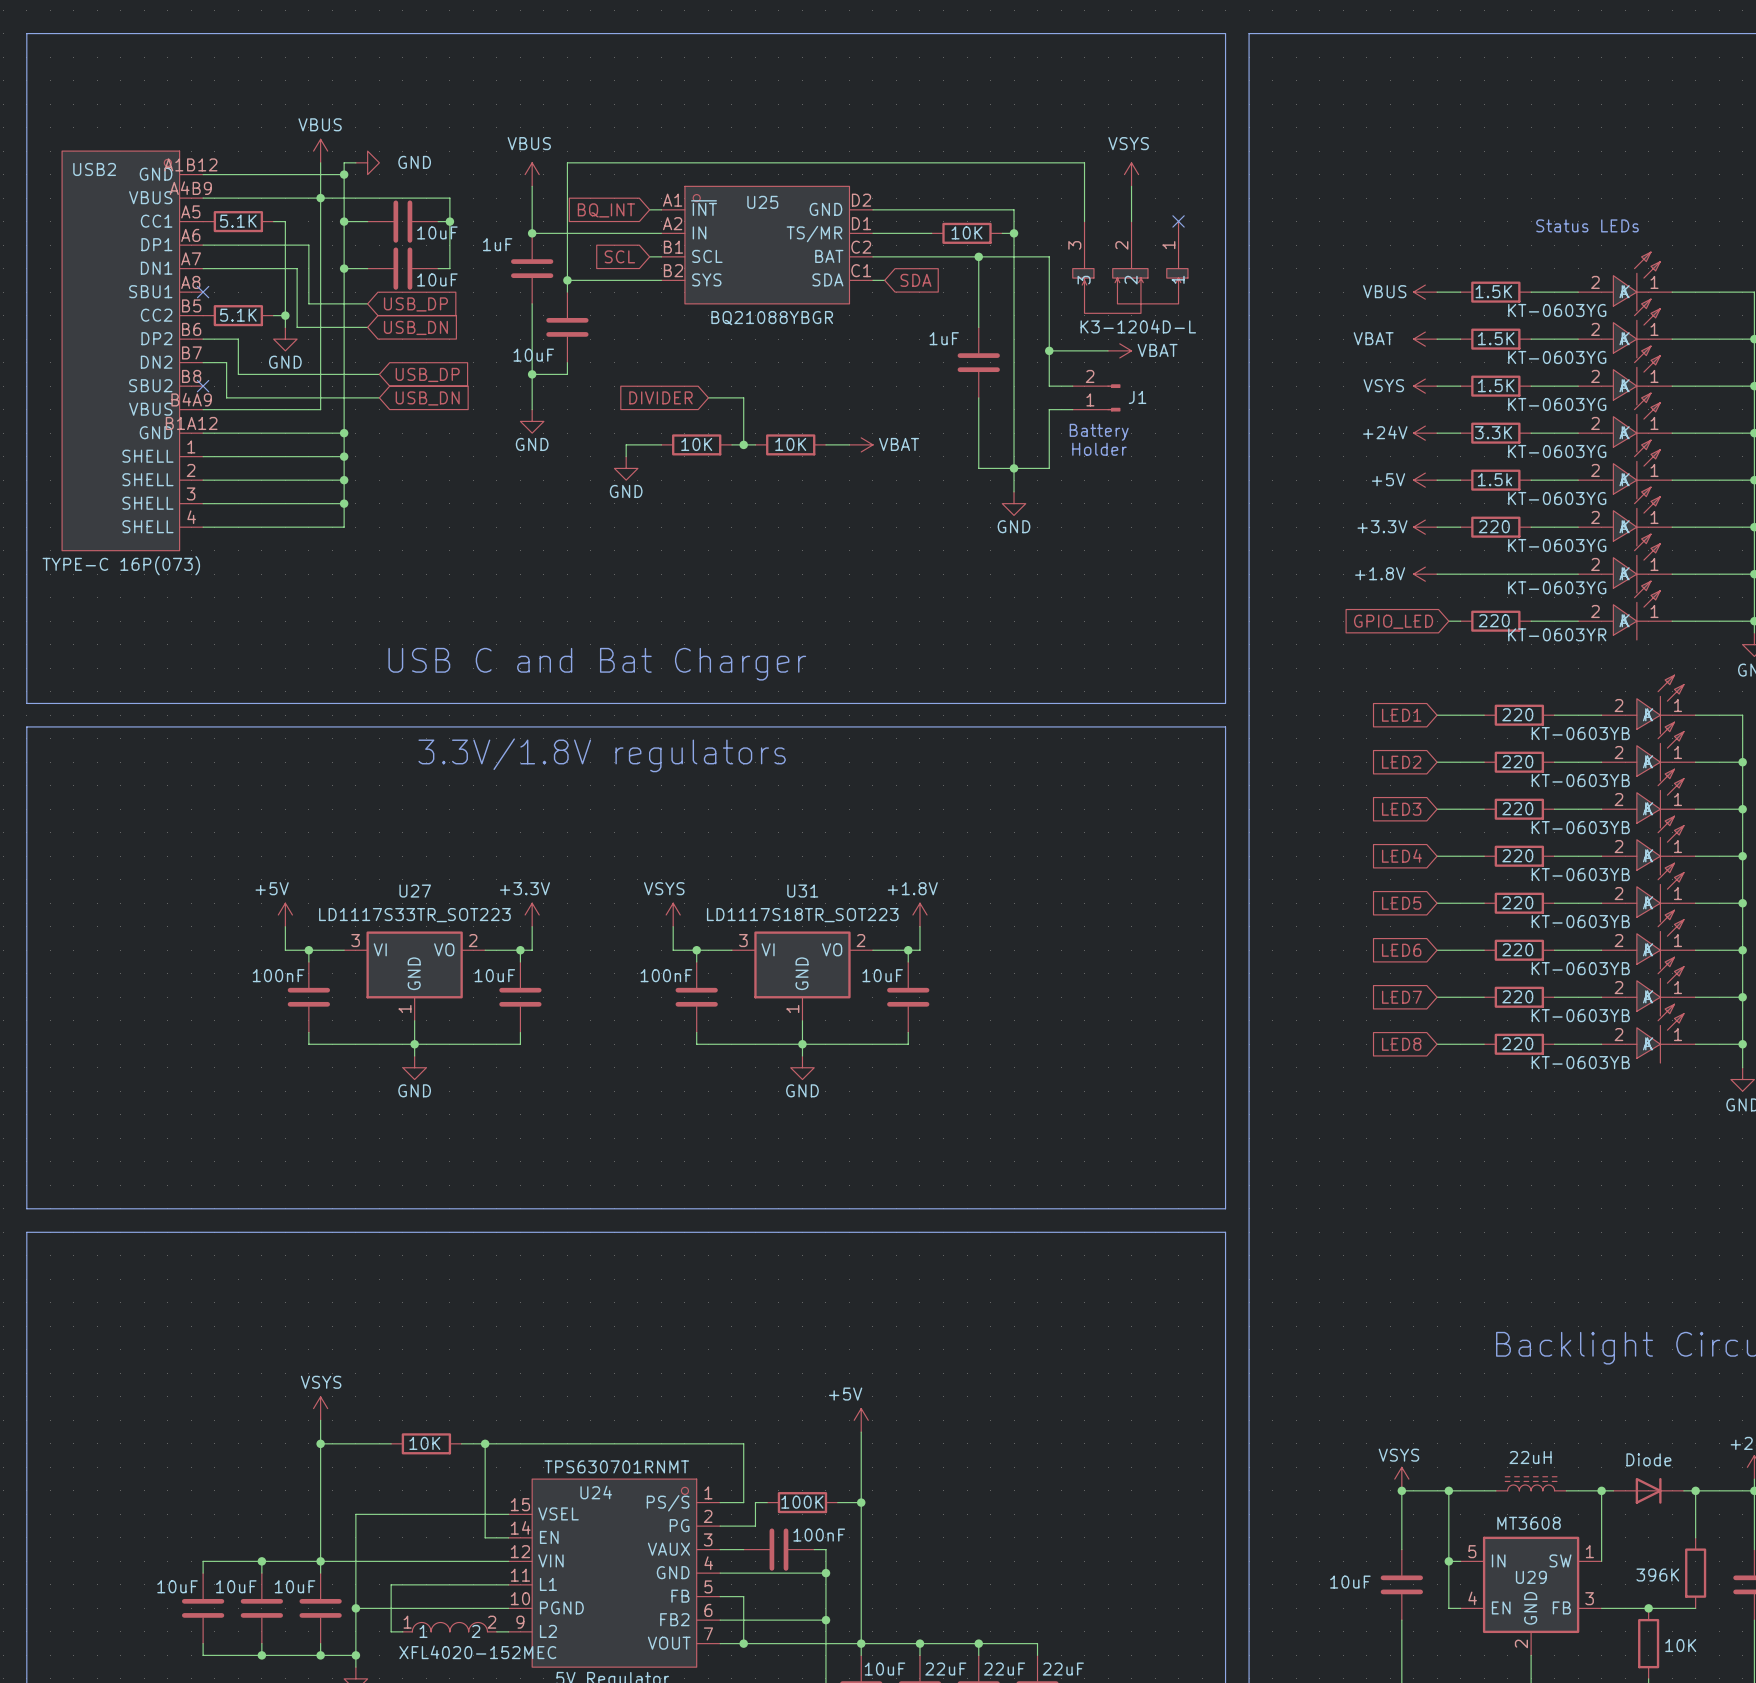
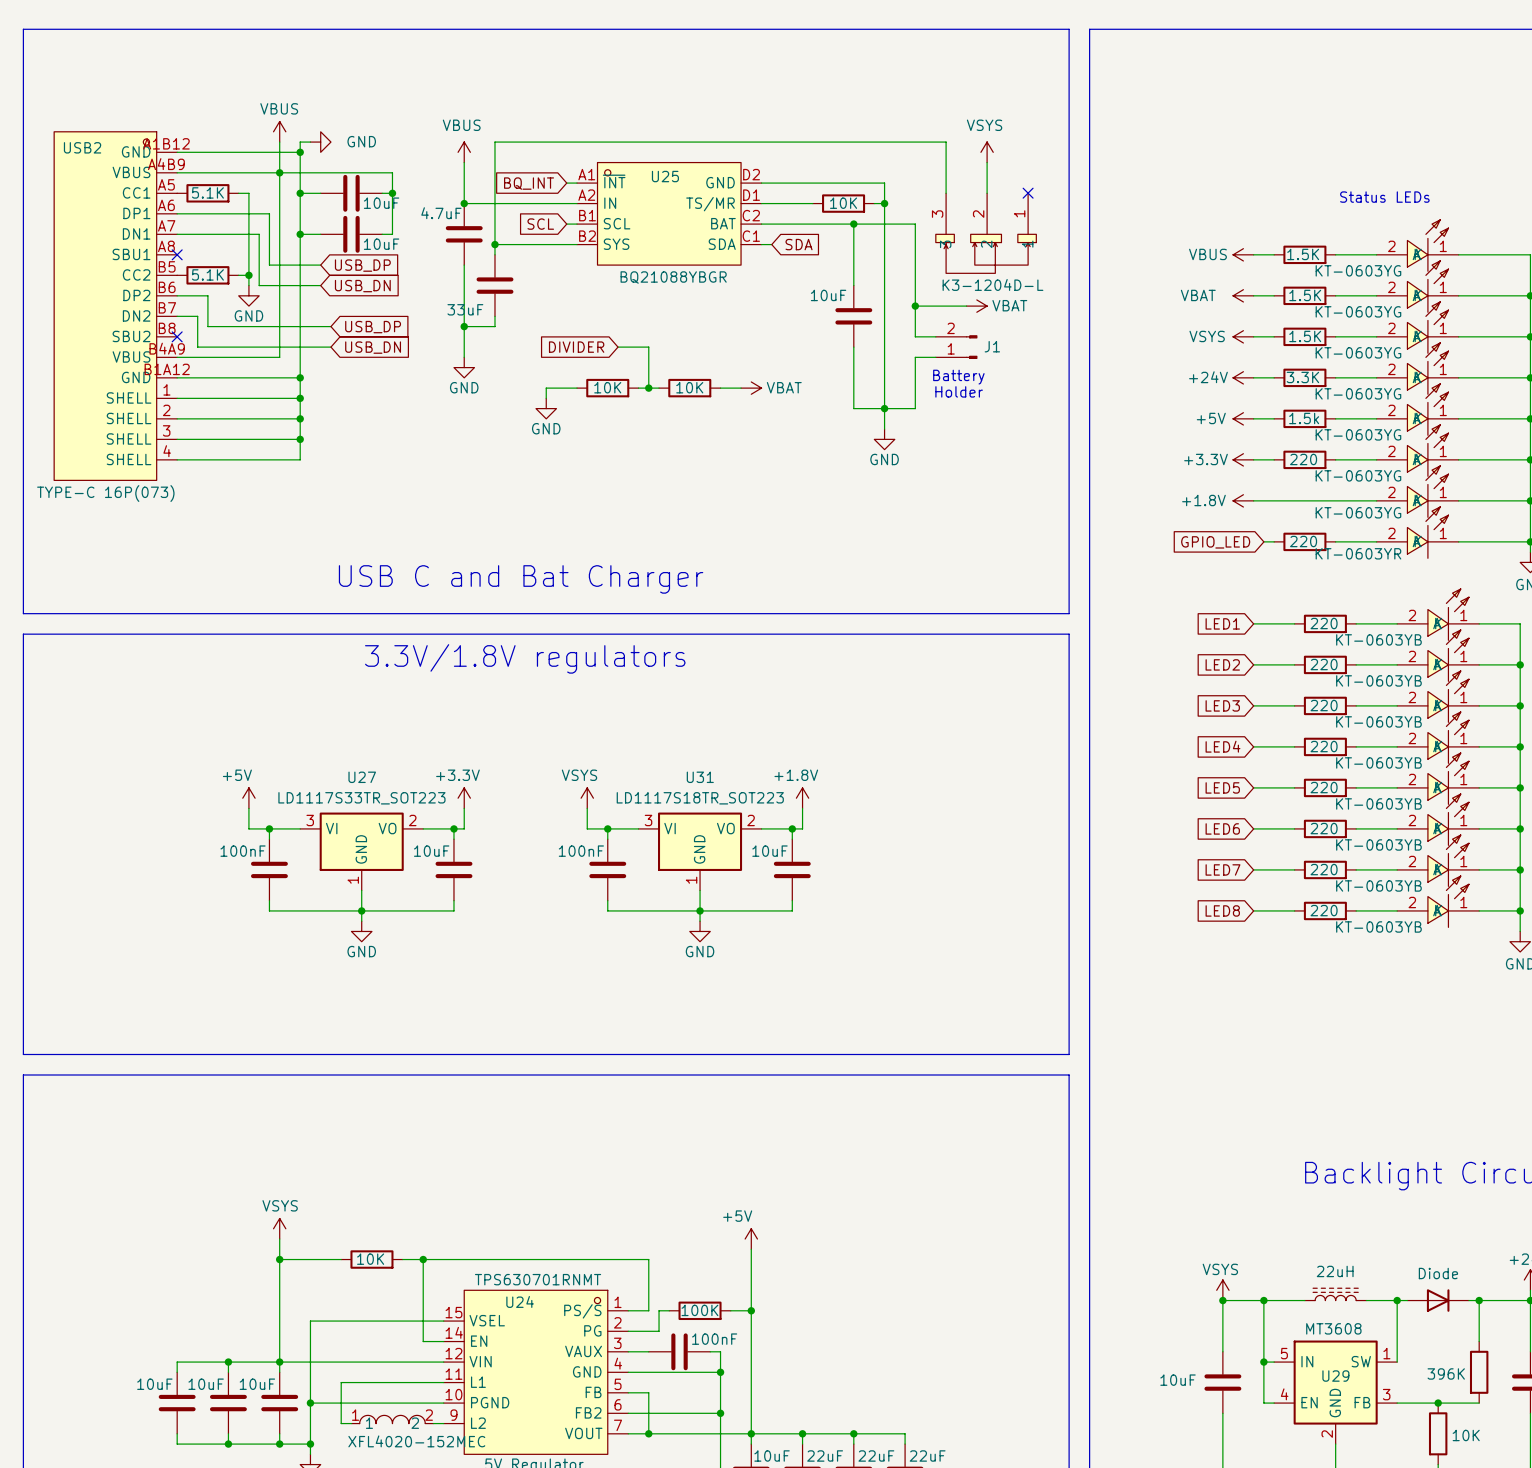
part value: 1uF (497, 244) -> 4.7uF (441, 213)
part value: 1uF (944, 338) -> 10uF (828, 295)
part value: 10uF (533, 355) -> 33uF (465, 309)

